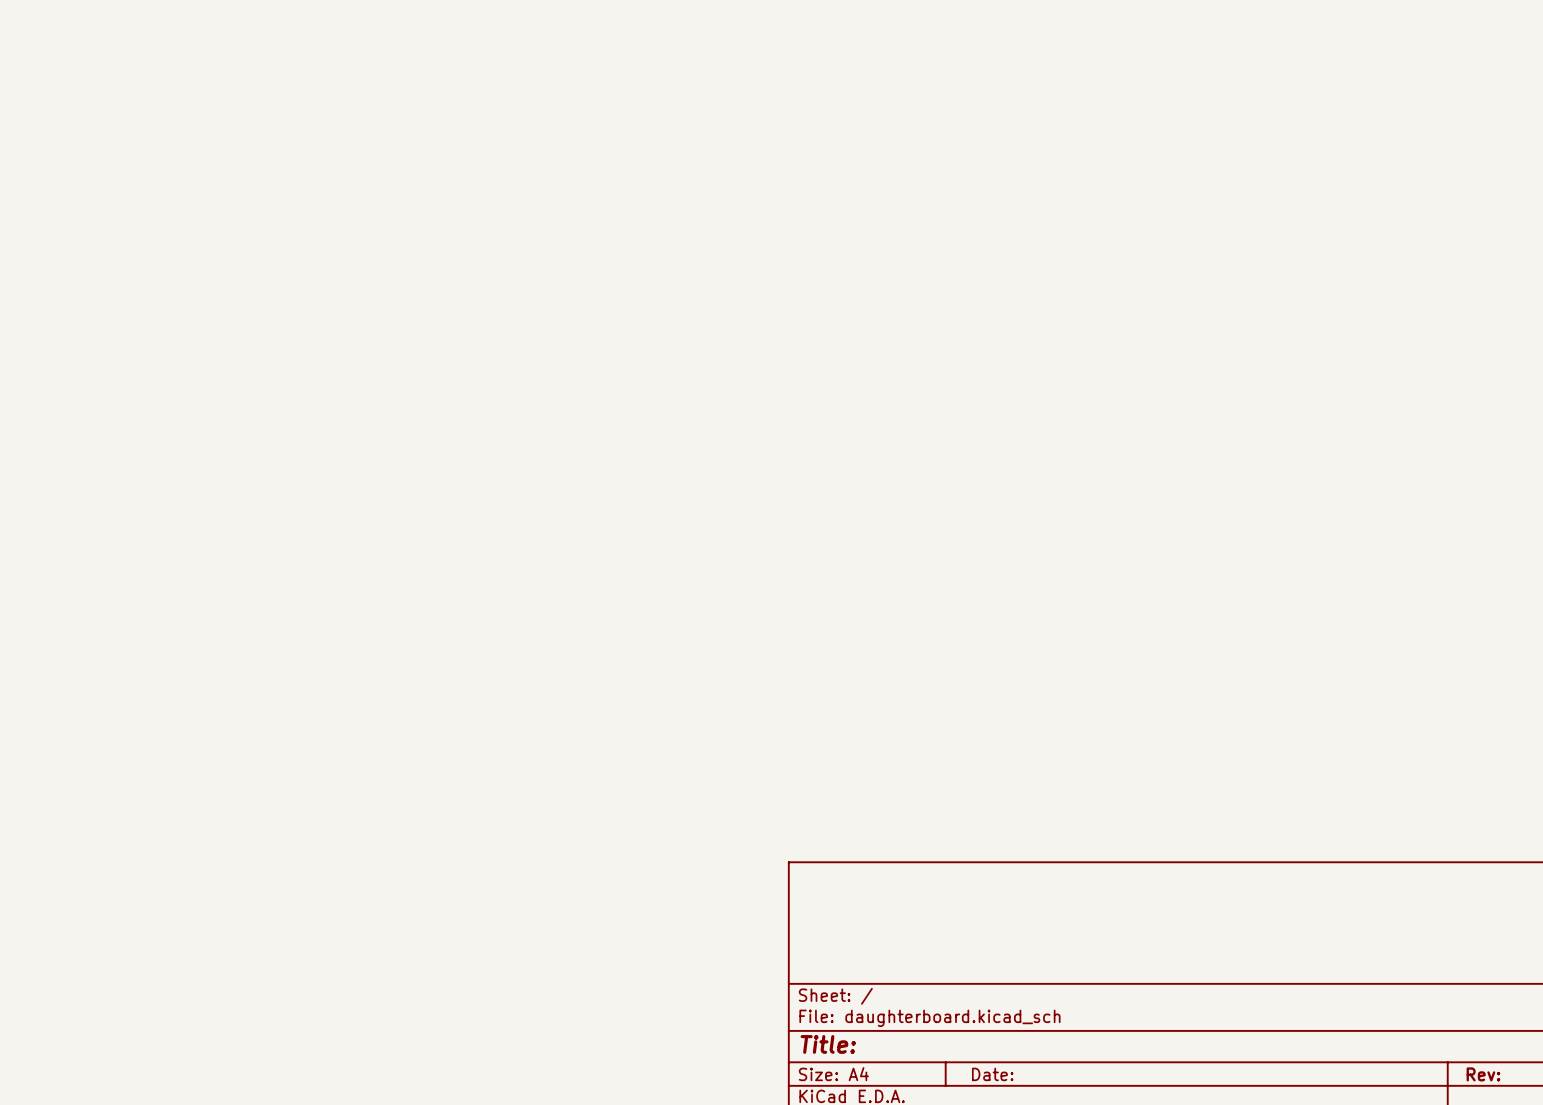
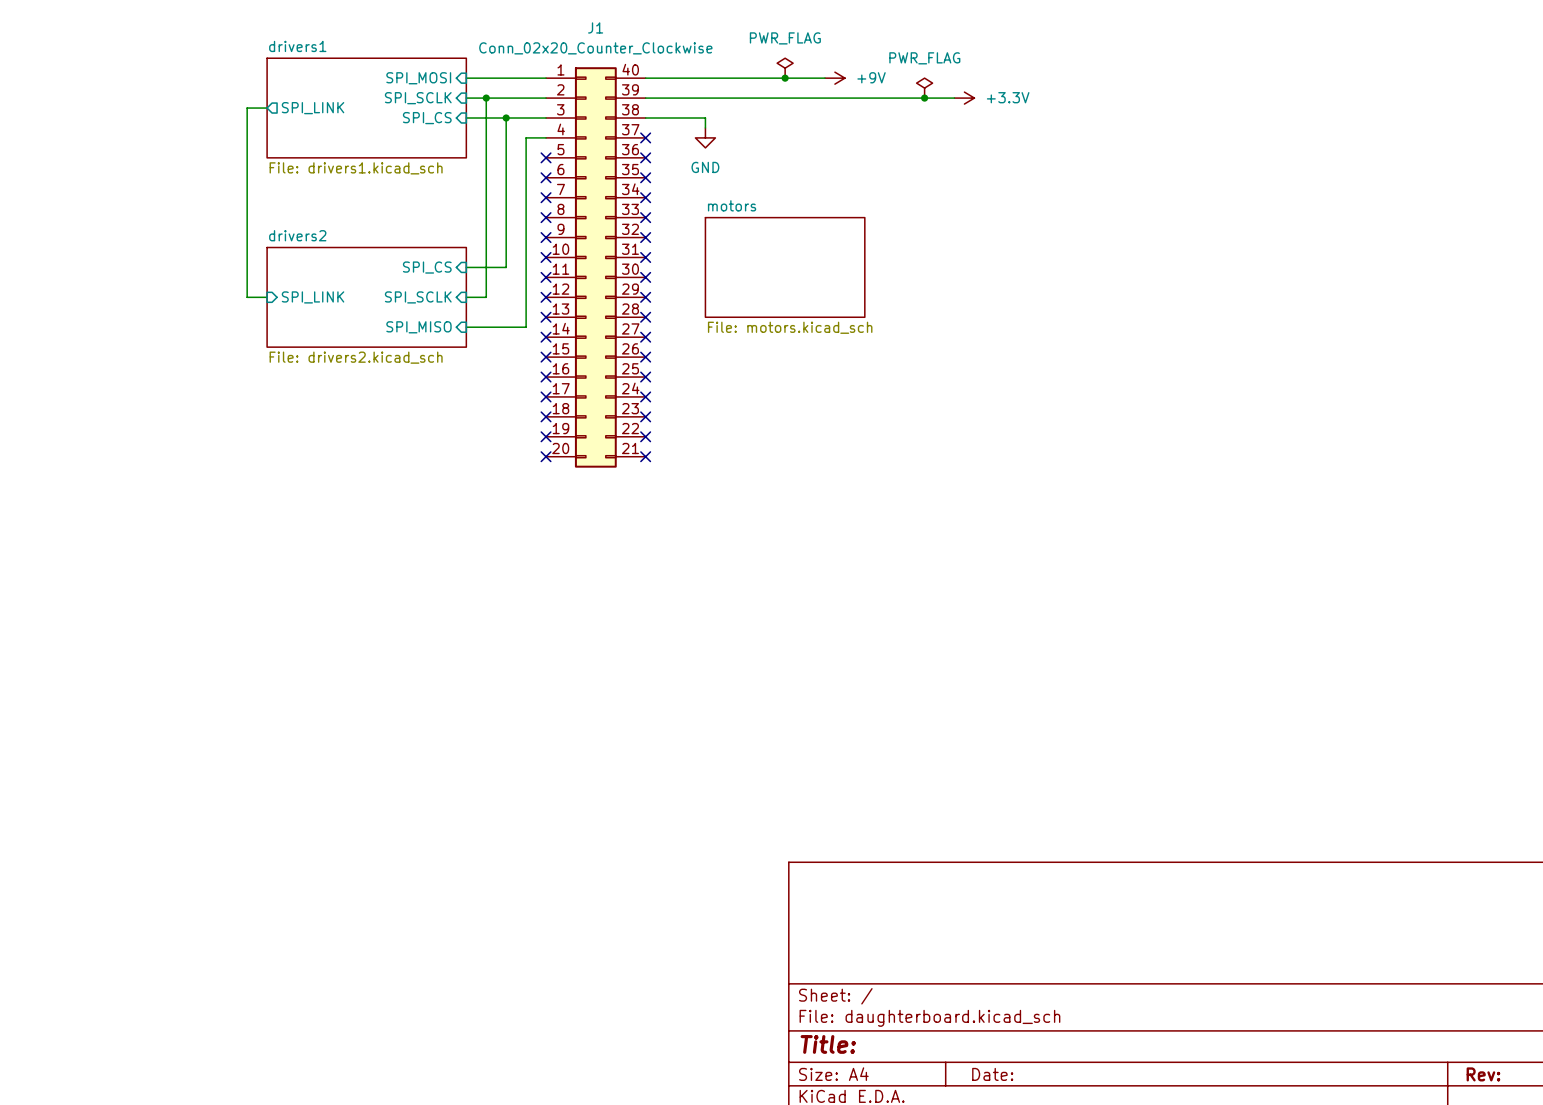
power symbol: none -> PWR_FLAG (785, 68)
sheet pin: none -> SPI_MOSI (418, 78)
wire: none -> (466, 78) (546, 78)
wire: none -> (645, 78) (824, 78)
junction: none -> (785, 78)
power symbol: none -> +9V (834, 78)
power symbol: none -> PWR_FLAG (924, 88)
sheet pin: none -> SPI_SCLK (418, 98)
wire: none -> (466, 98) (546, 98)
wire: none -> (486, 98) (486, 297) (466, 297)
junction: none -> (486, 98)
wire: none -> (645, 98) (954, 98)
junction: none -> (924, 98)
power symbol: none -> +3.3V (964, 98)
wire: none -> (267, 108) (247, 108) (247, 297) (267, 297)
sheet pin: none -> SPI_LINK (313, 108)
sheet drivers1: none -> File: drivers1.kicad_sch (366, 108)
sheet pin: none -> SPI_CS (427, 118)
wire: none -> (466, 118) (546, 118)
wire: none -> (506, 118) (506, 267) (466, 267)
junction: none -> (506, 118)
wire: none -> (645, 118) (705, 118) (705, 127)
wire: none -> (546, 137) (526, 137) (526, 327) (466, 327)
no-connect mark: none -> (645, 137)
power symbol: none -> GND (705, 137)
no-connect mark: none -> (546, 157)
no-connect mark: none -> (645, 157)
no-connect mark: none -> (546, 177)
no-connect mark: none -> (645, 177)
no-connect mark: none -> (546, 197)
no-connect mark: none -> (645, 197)
no-connect mark: none -> (546, 217)
no-connect mark: none -> (645, 217)
no-connect mark: none -> (546, 237)
no-connect mark: none -> (645, 237)
no-connect mark: none -> (546, 257)
no-connect mark: none -> (645, 257)
sheet pin: none -> SPI_CS (427, 267)
J1: none -> Conn_02x20_Counter_Clockwise (595, 267)
sheet motors: none -> File: motors.kicad_sch (785, 267)
no-connect mark: none -> (546, 277)
no-connect mark: none -> (645, 277)
sheet pin: none -> SPI_LINK (313, 297)
sheet drivers2: none -> File: drivers2.kicad_sch (366, 297)
sheet pin: none -> SPI_SCLK (418, 297)
no-connect mark: none -> (546, 297)
no-connect mark: none -> (645, 297)
no-connect mark: none -> (546, 317)
no-connect mark: none -> (645, 317)
sheet pin: none -> SPI_MISO (418, 327)
no-connect mark: none -> (546, 337)
no-connect mark: none -> (645, 337)
no-connect mark: none -> (546, 357)
no-connect mark: none -> (645, 357)
no-connect mark: none -> (546, 377)
no-connect mark: none -> (645, 377)
no-connect mark: none -> (546, 396)
no-connect mark: none -> (645, 396)
no-connect mark: none -> (546, 416)
no-connect mark: none -> (645, 416)
no-connect mark: none -> (546, 436)
no-connect mark: none -> (645, 436)
no-connect mark: none -> (546, 456)
no-connect mark: none -> (645, 456)

